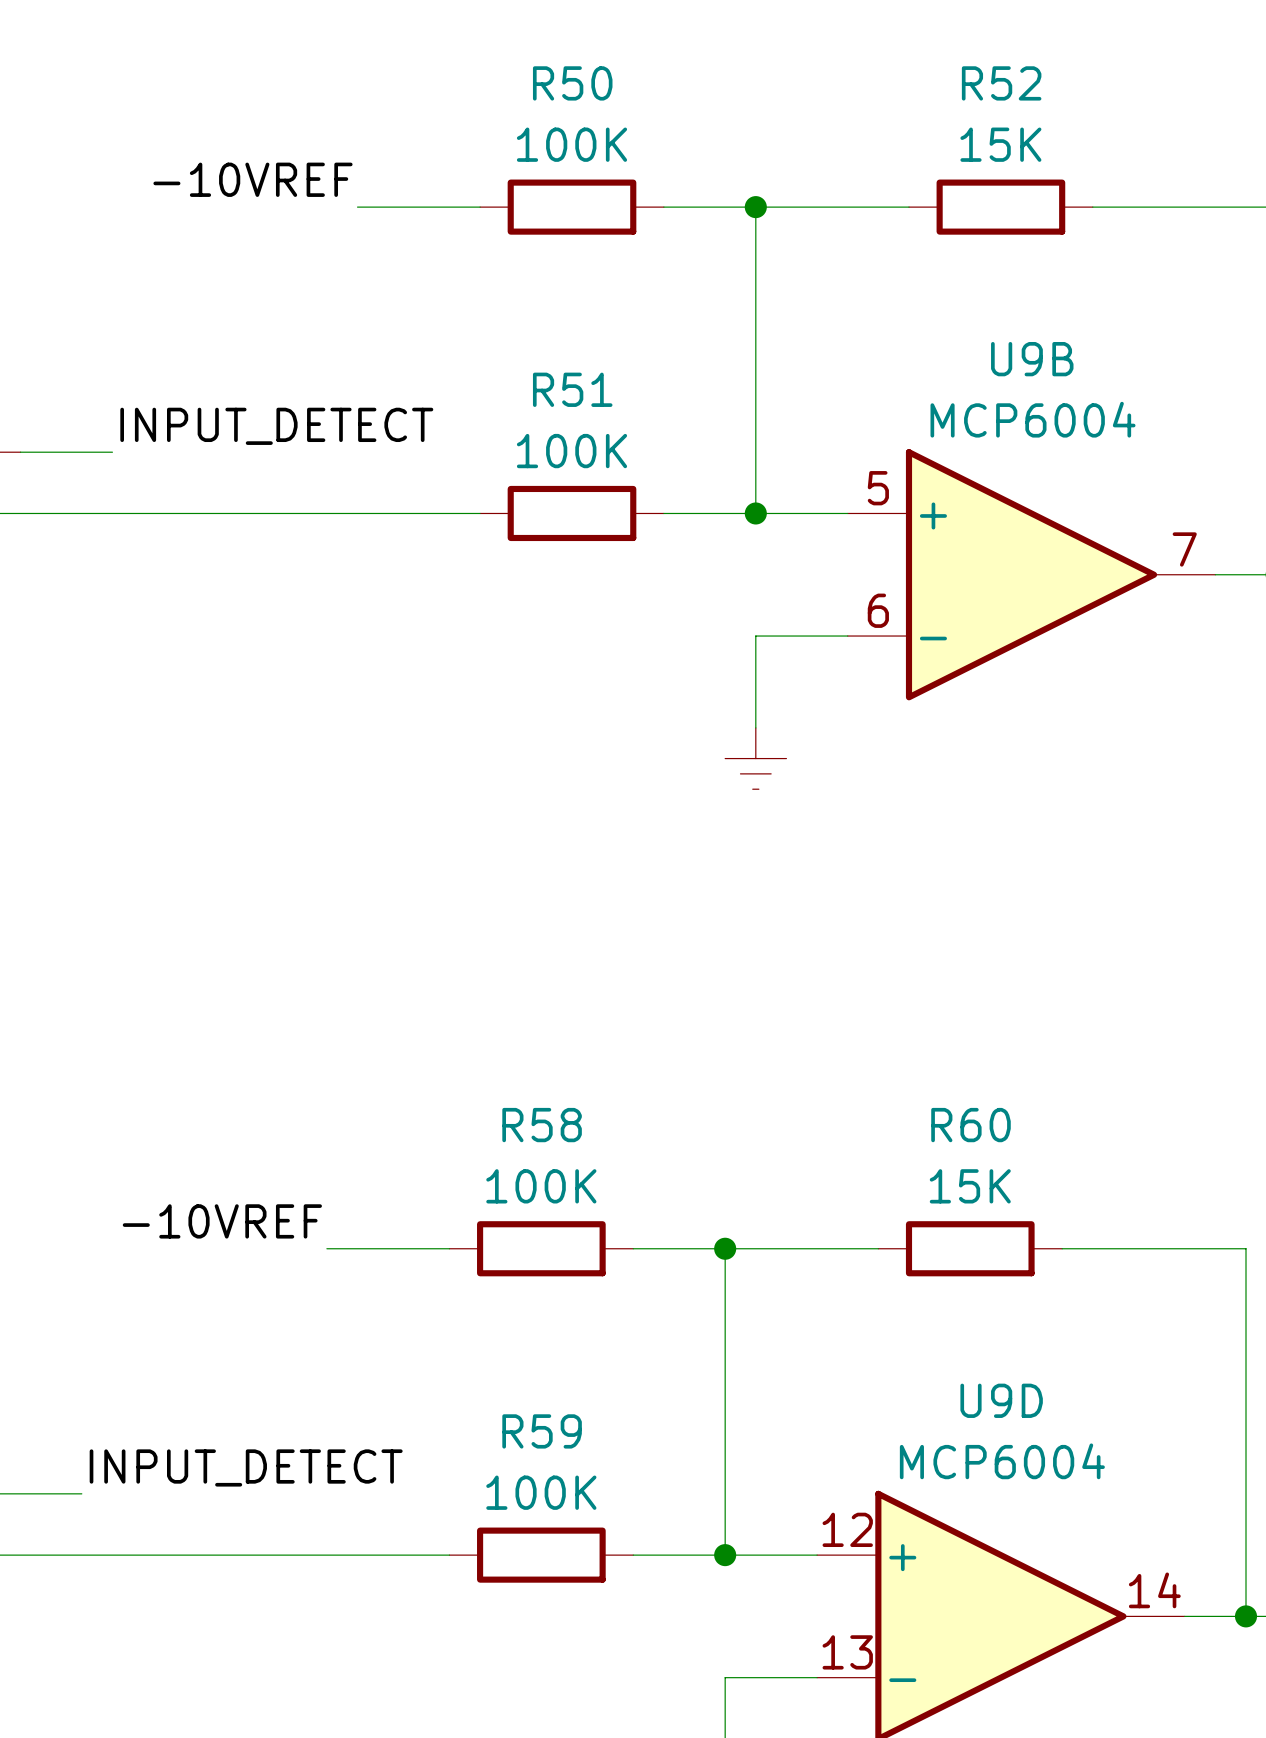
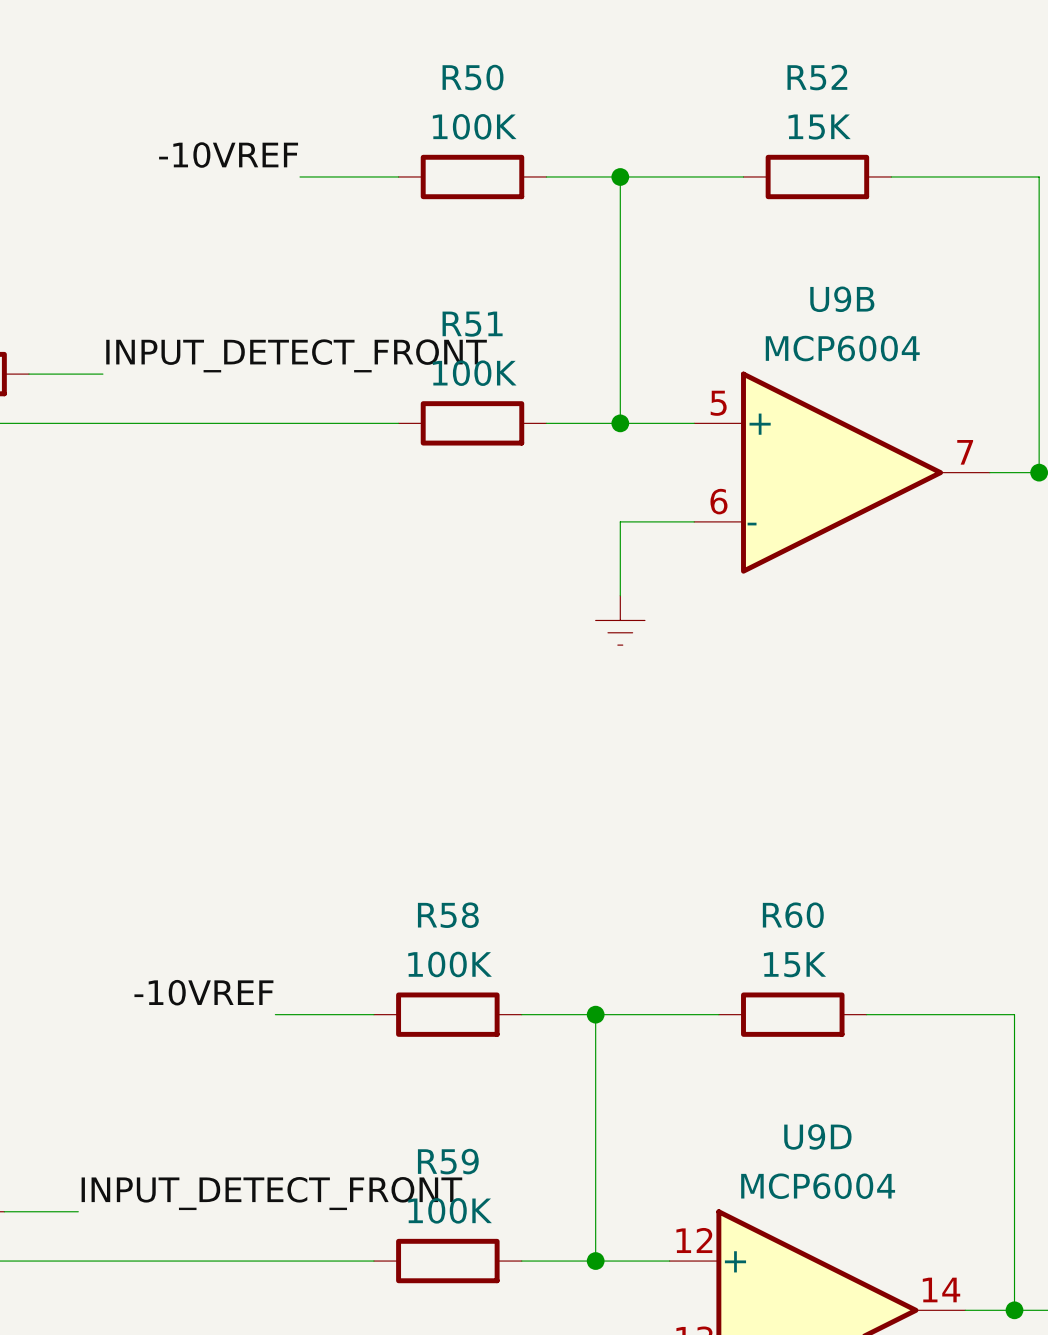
label: INPUT_DETECT (276, 426) -> INPUT_DETECT_FRONT (296, 355)
label: INPUT_DETECT (246, 1467) -> INPUT_DETECT_FRONT (271, 1193)

